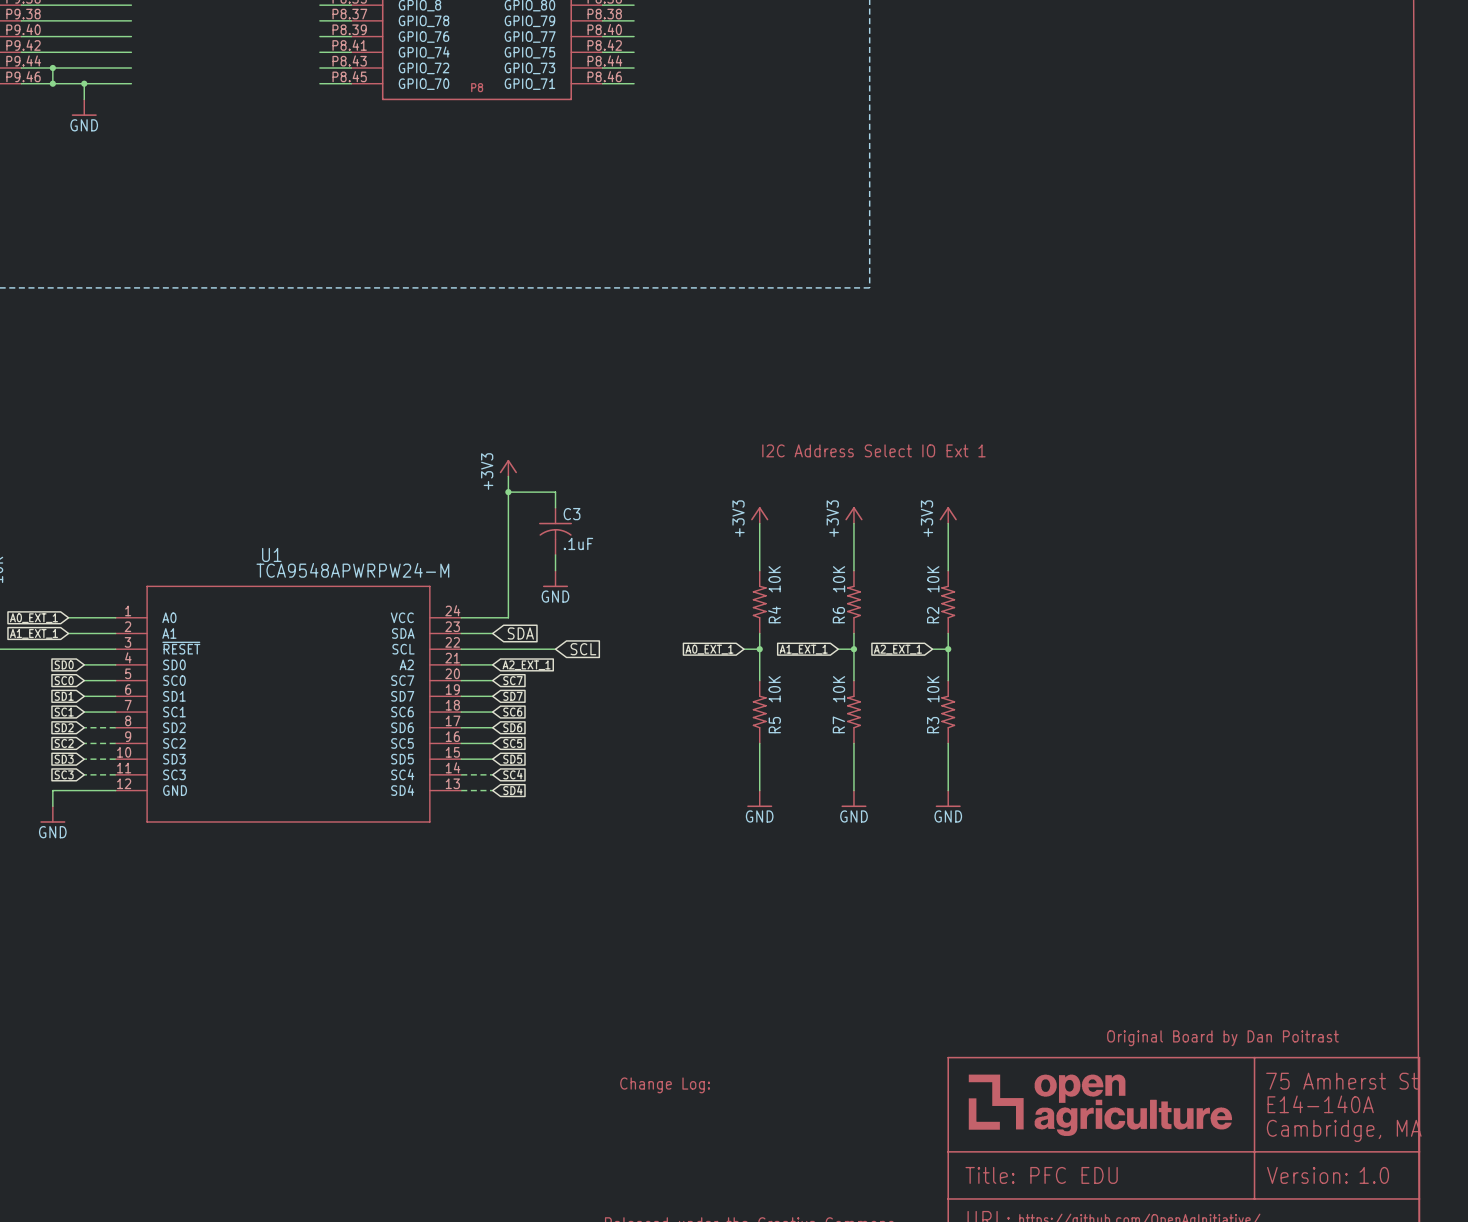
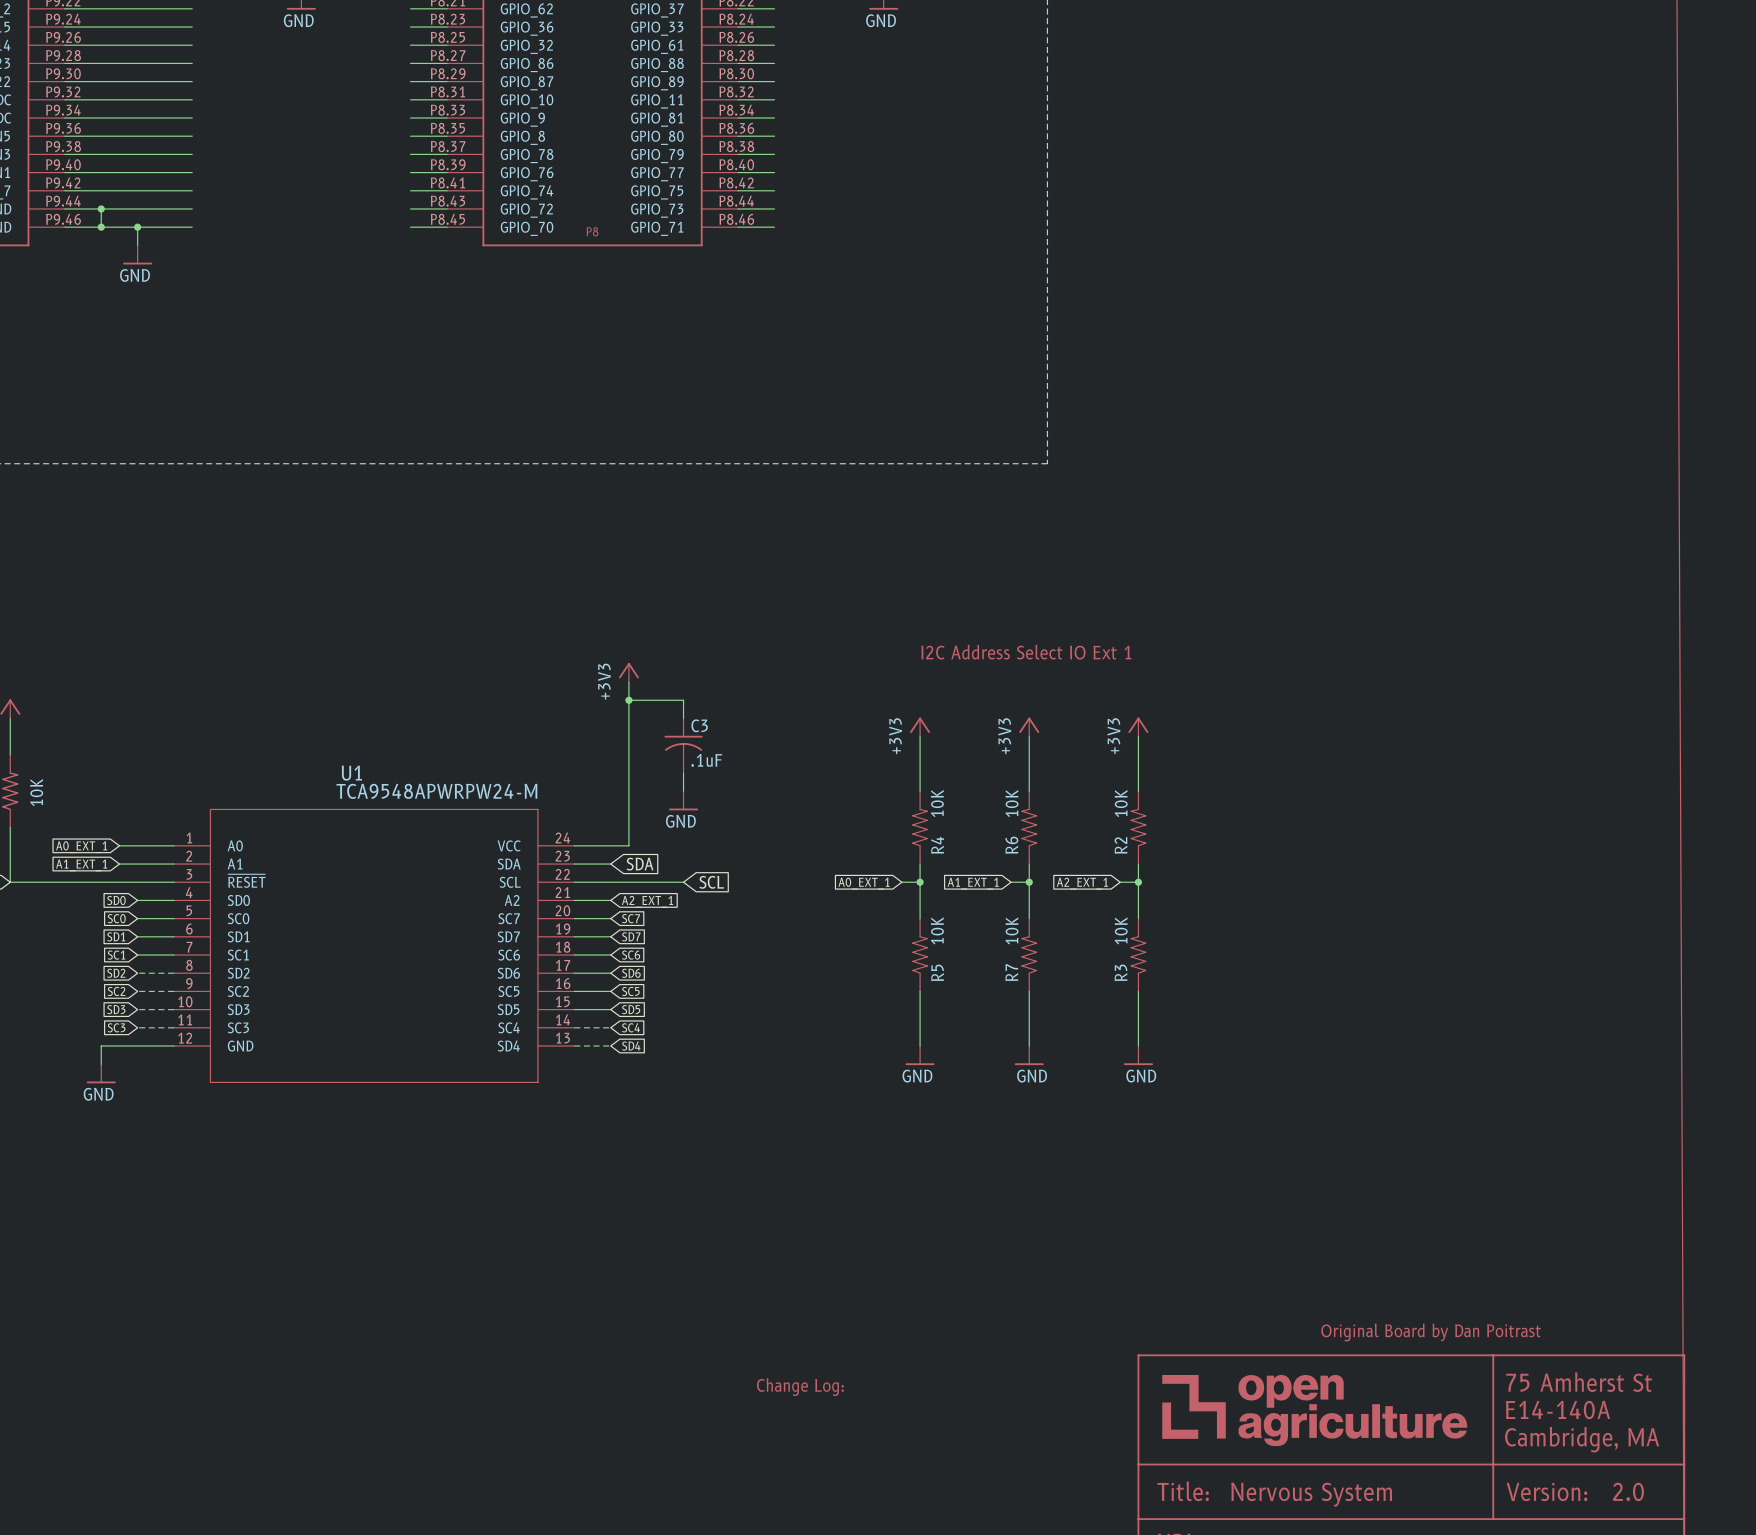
part text: PFC EDU (1074, 1175) -> Nervous System (1311, 1494)
part text: 1.0 (1374, 1175) -> 2.0 (1628, 1491)

